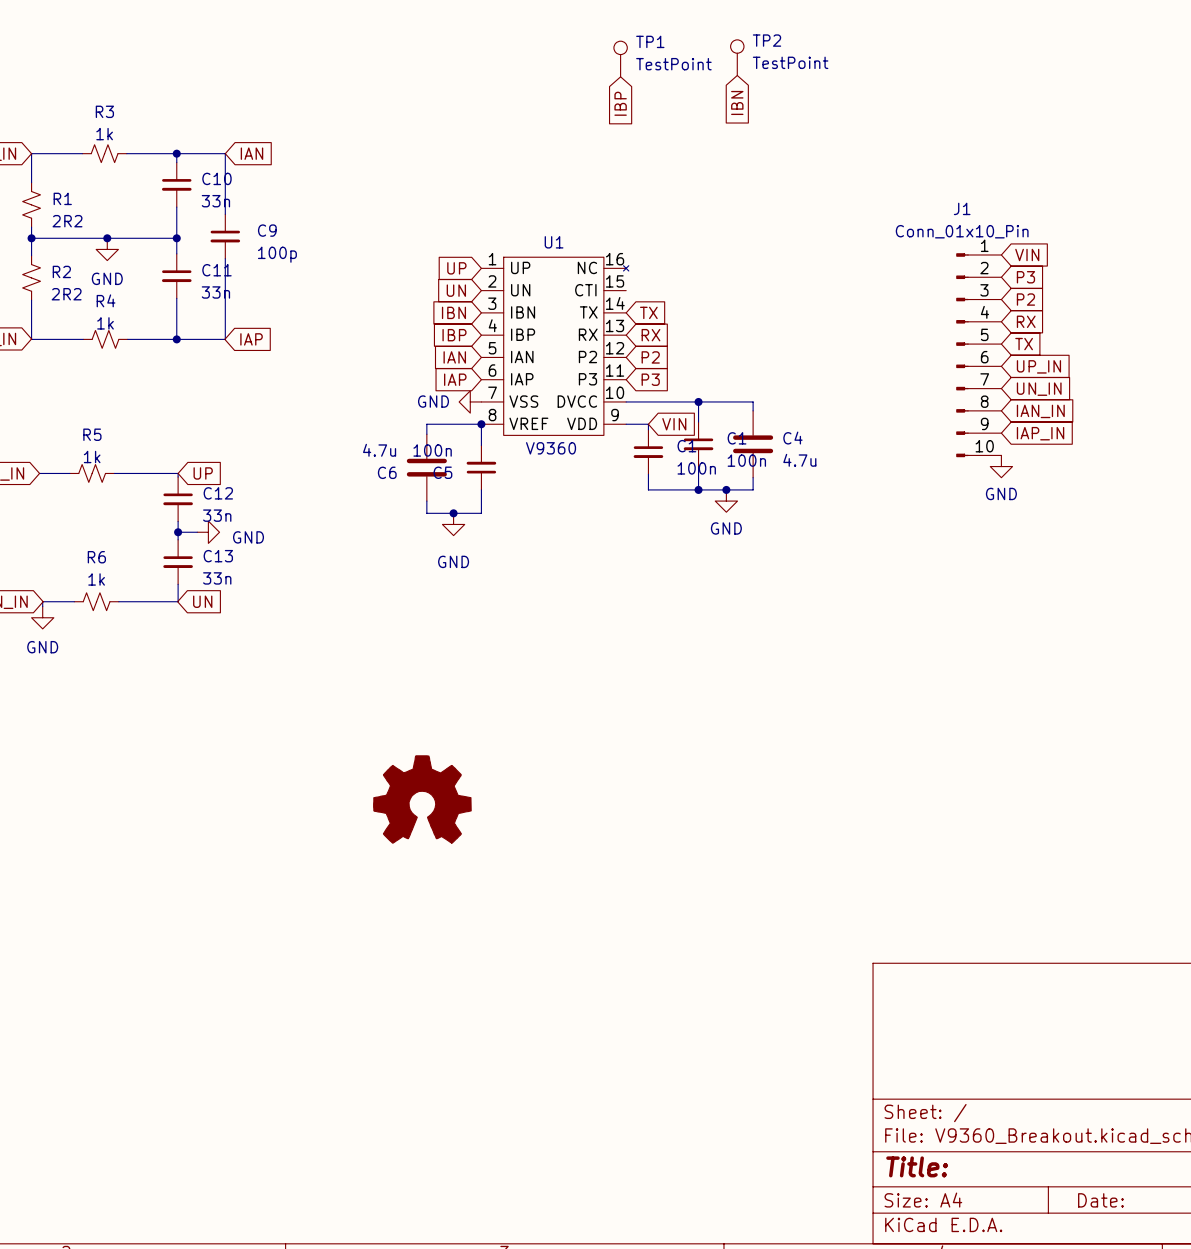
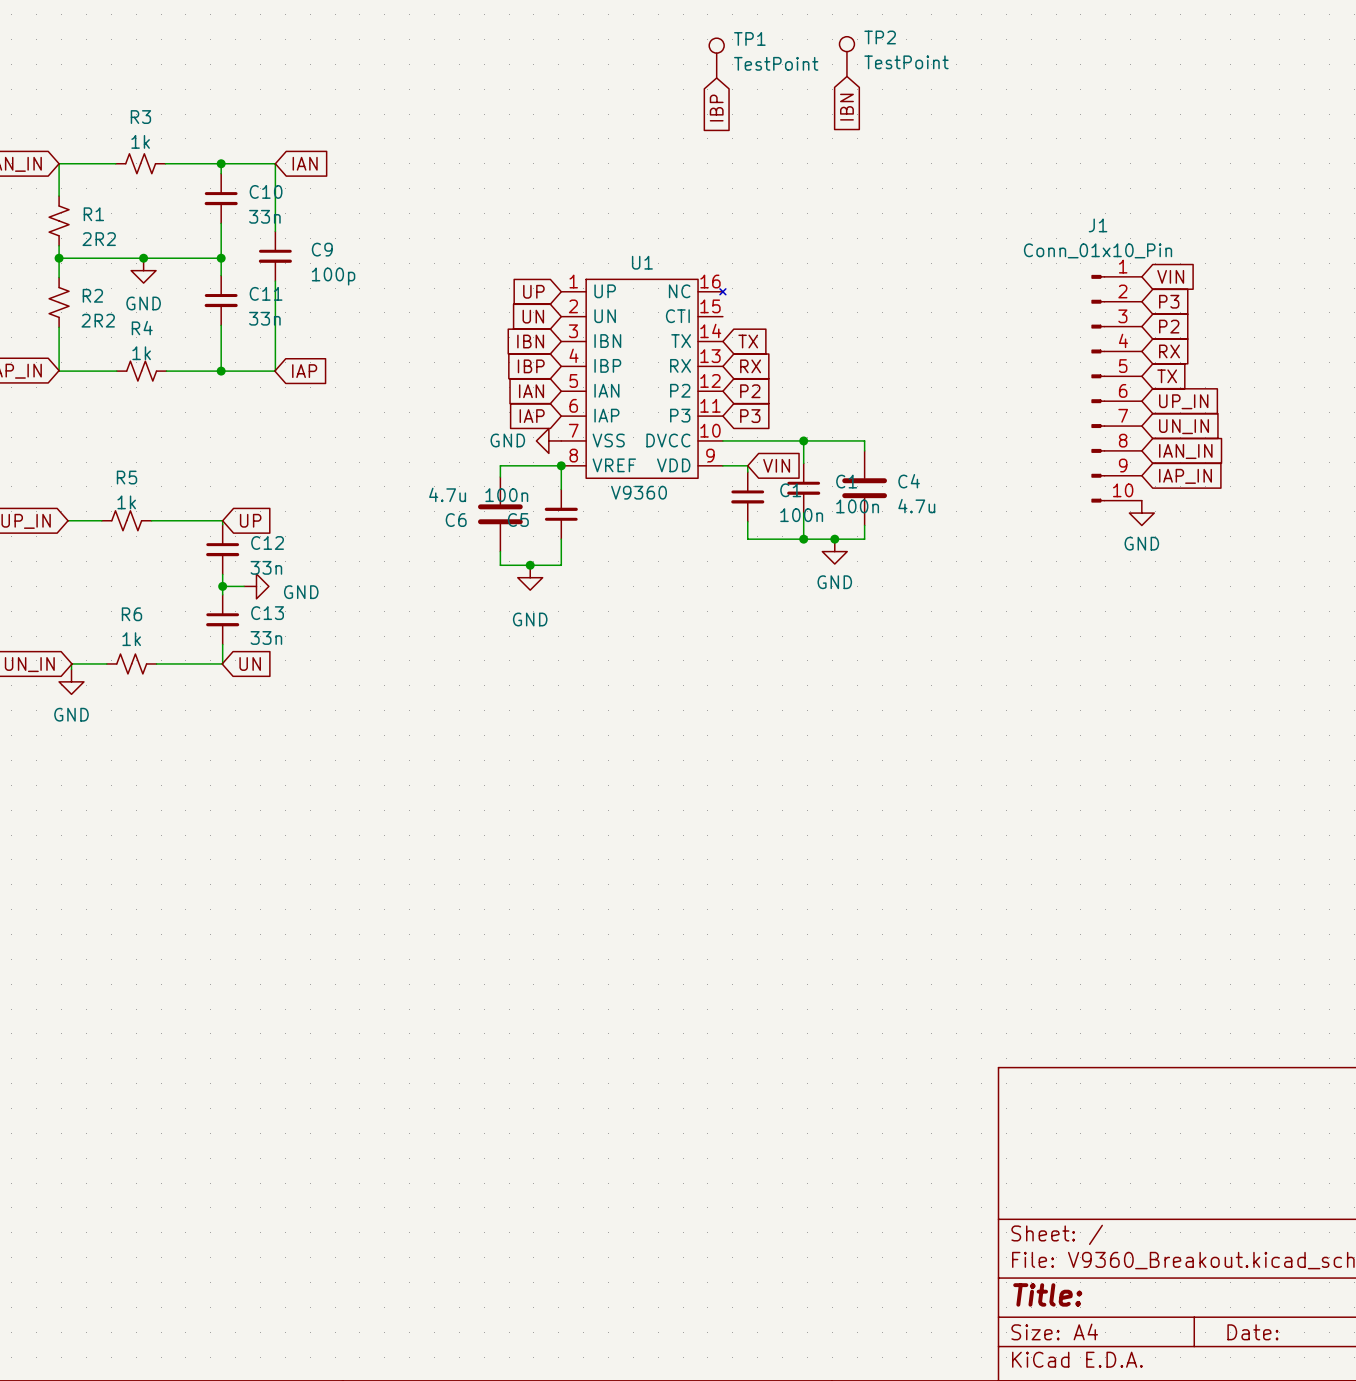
part: (422, 799) -> none

